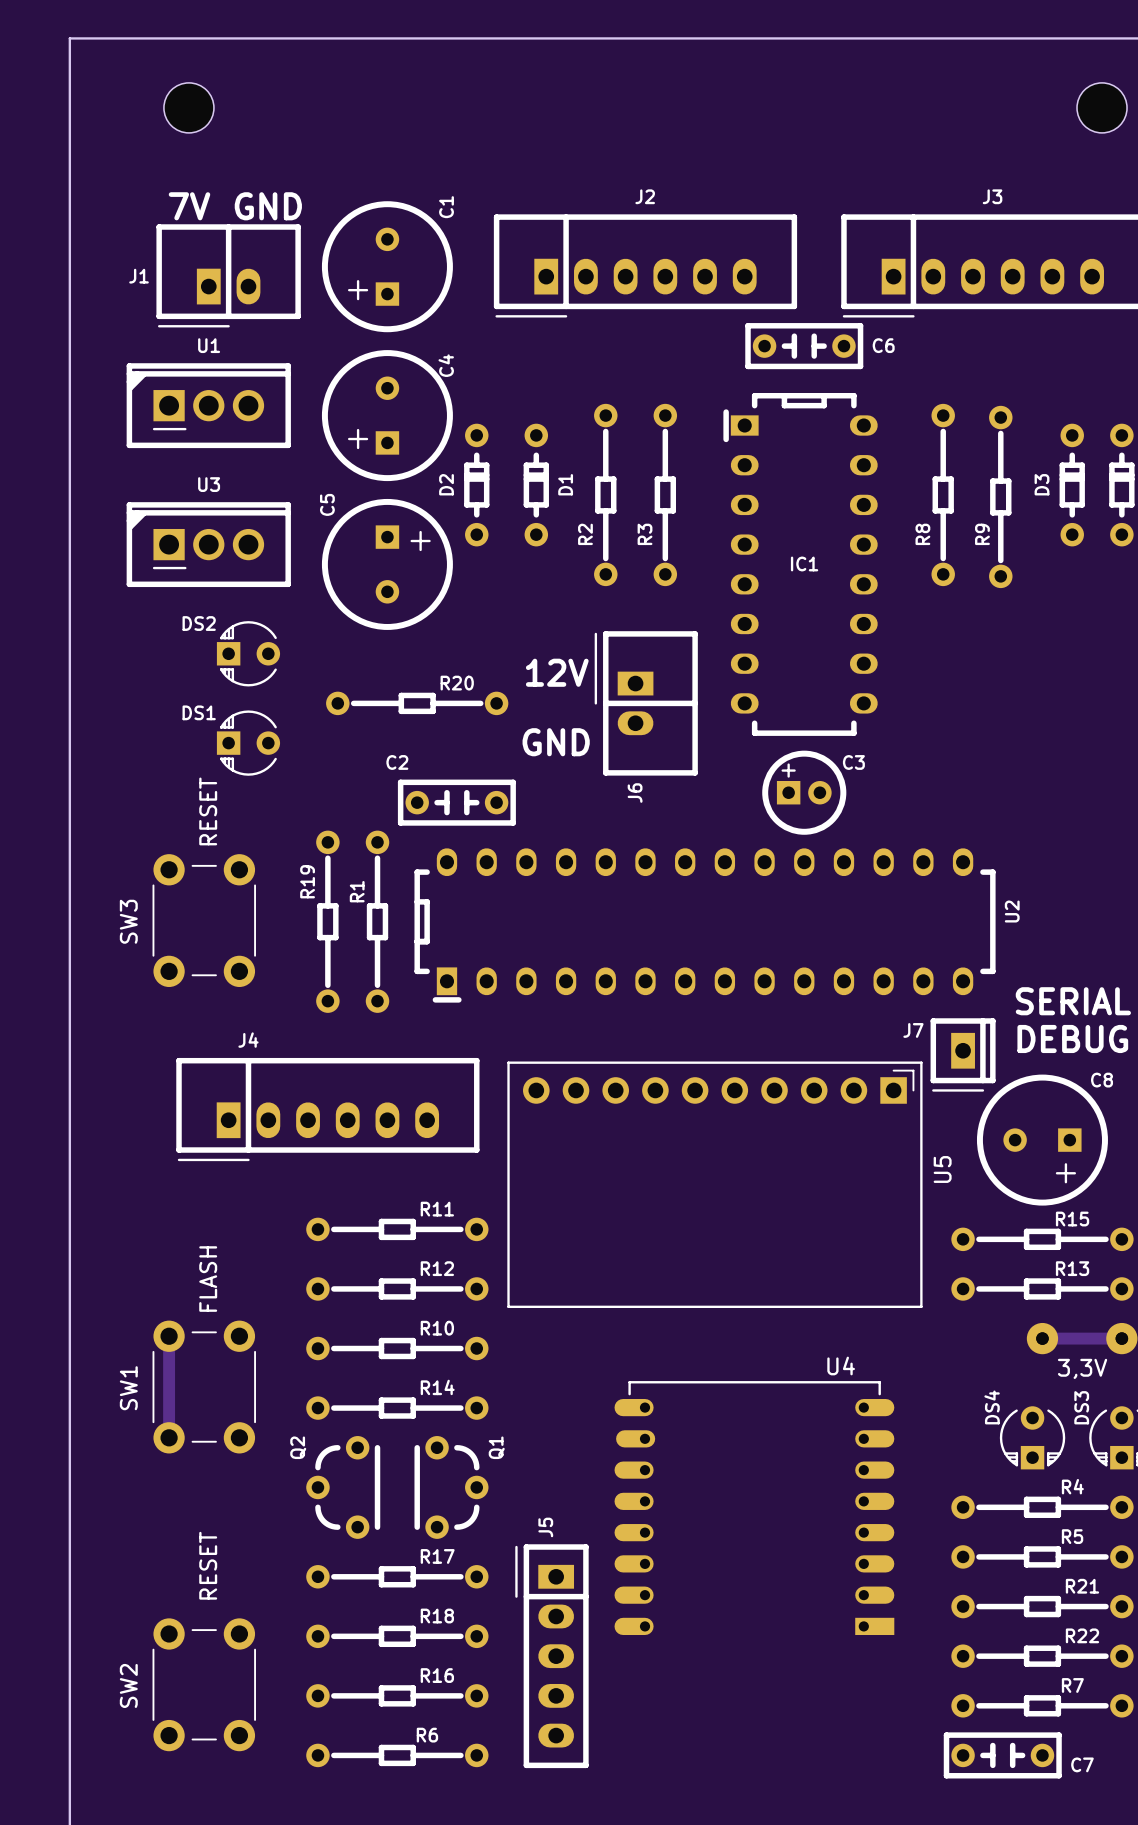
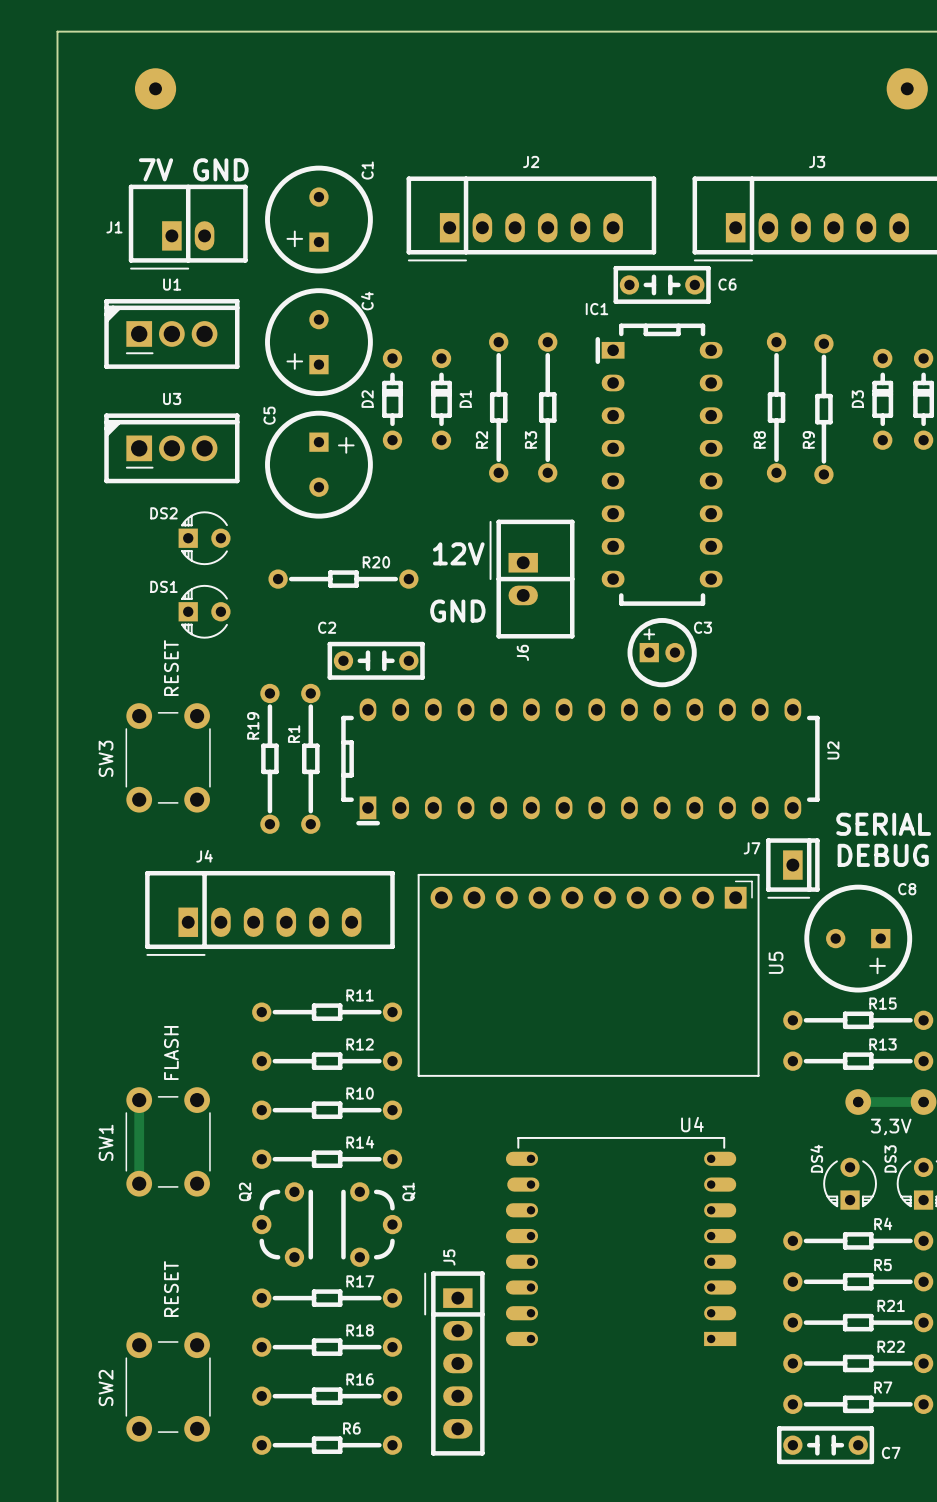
part footprint: [163, 82, 214, 133] -> [134, 68, 177, 110]
part footprint: [1077, 82, 1128, 133] -> [886, 68, 928, 110]
IC1 name position: IC1 (804, 563) -> IC1 (597, 309)

